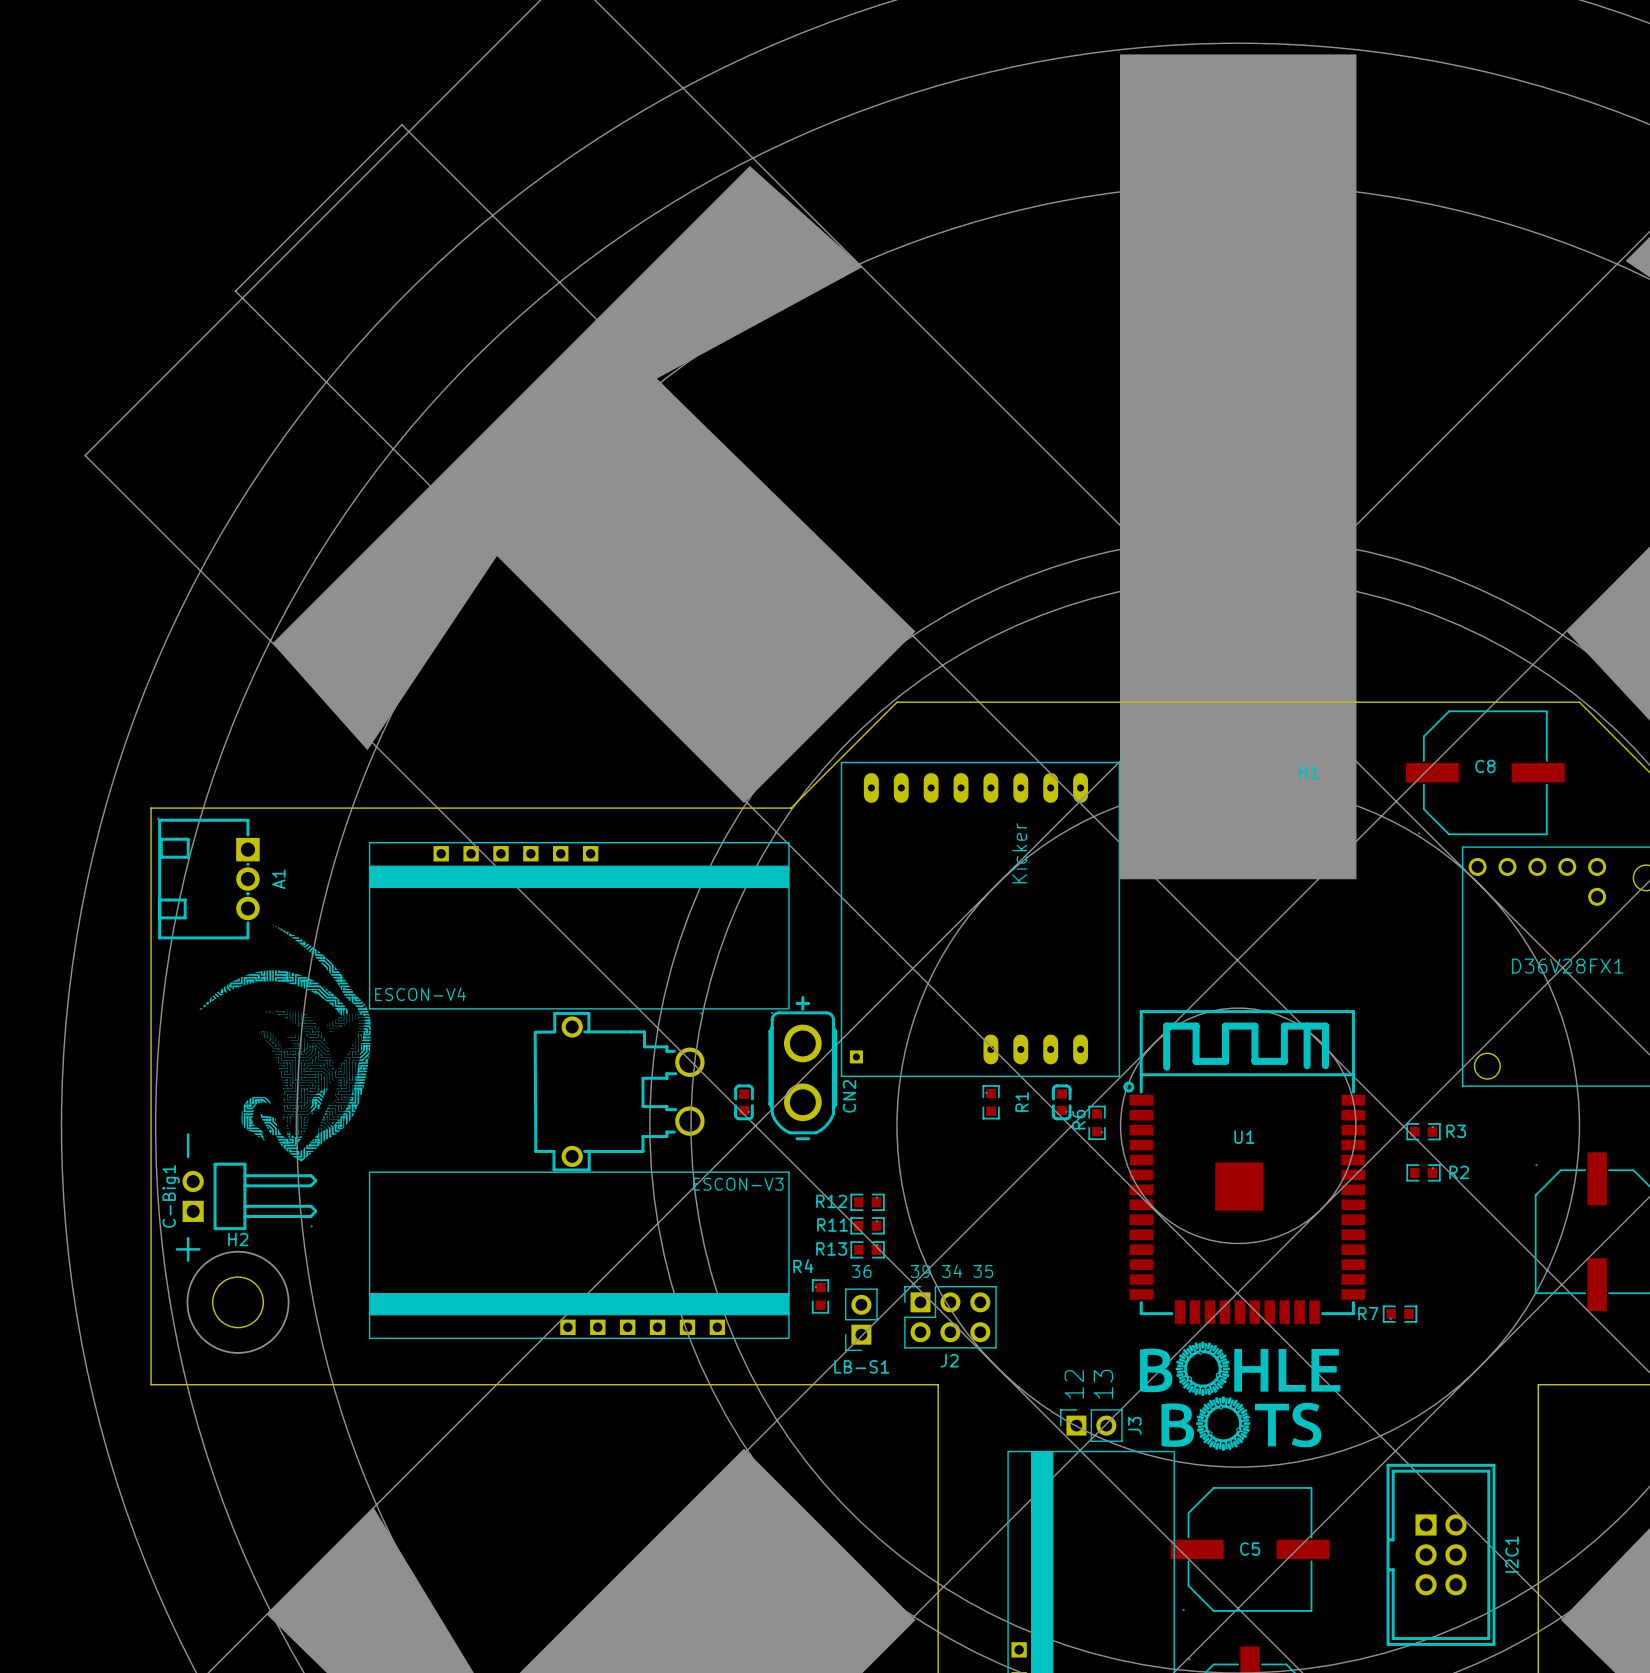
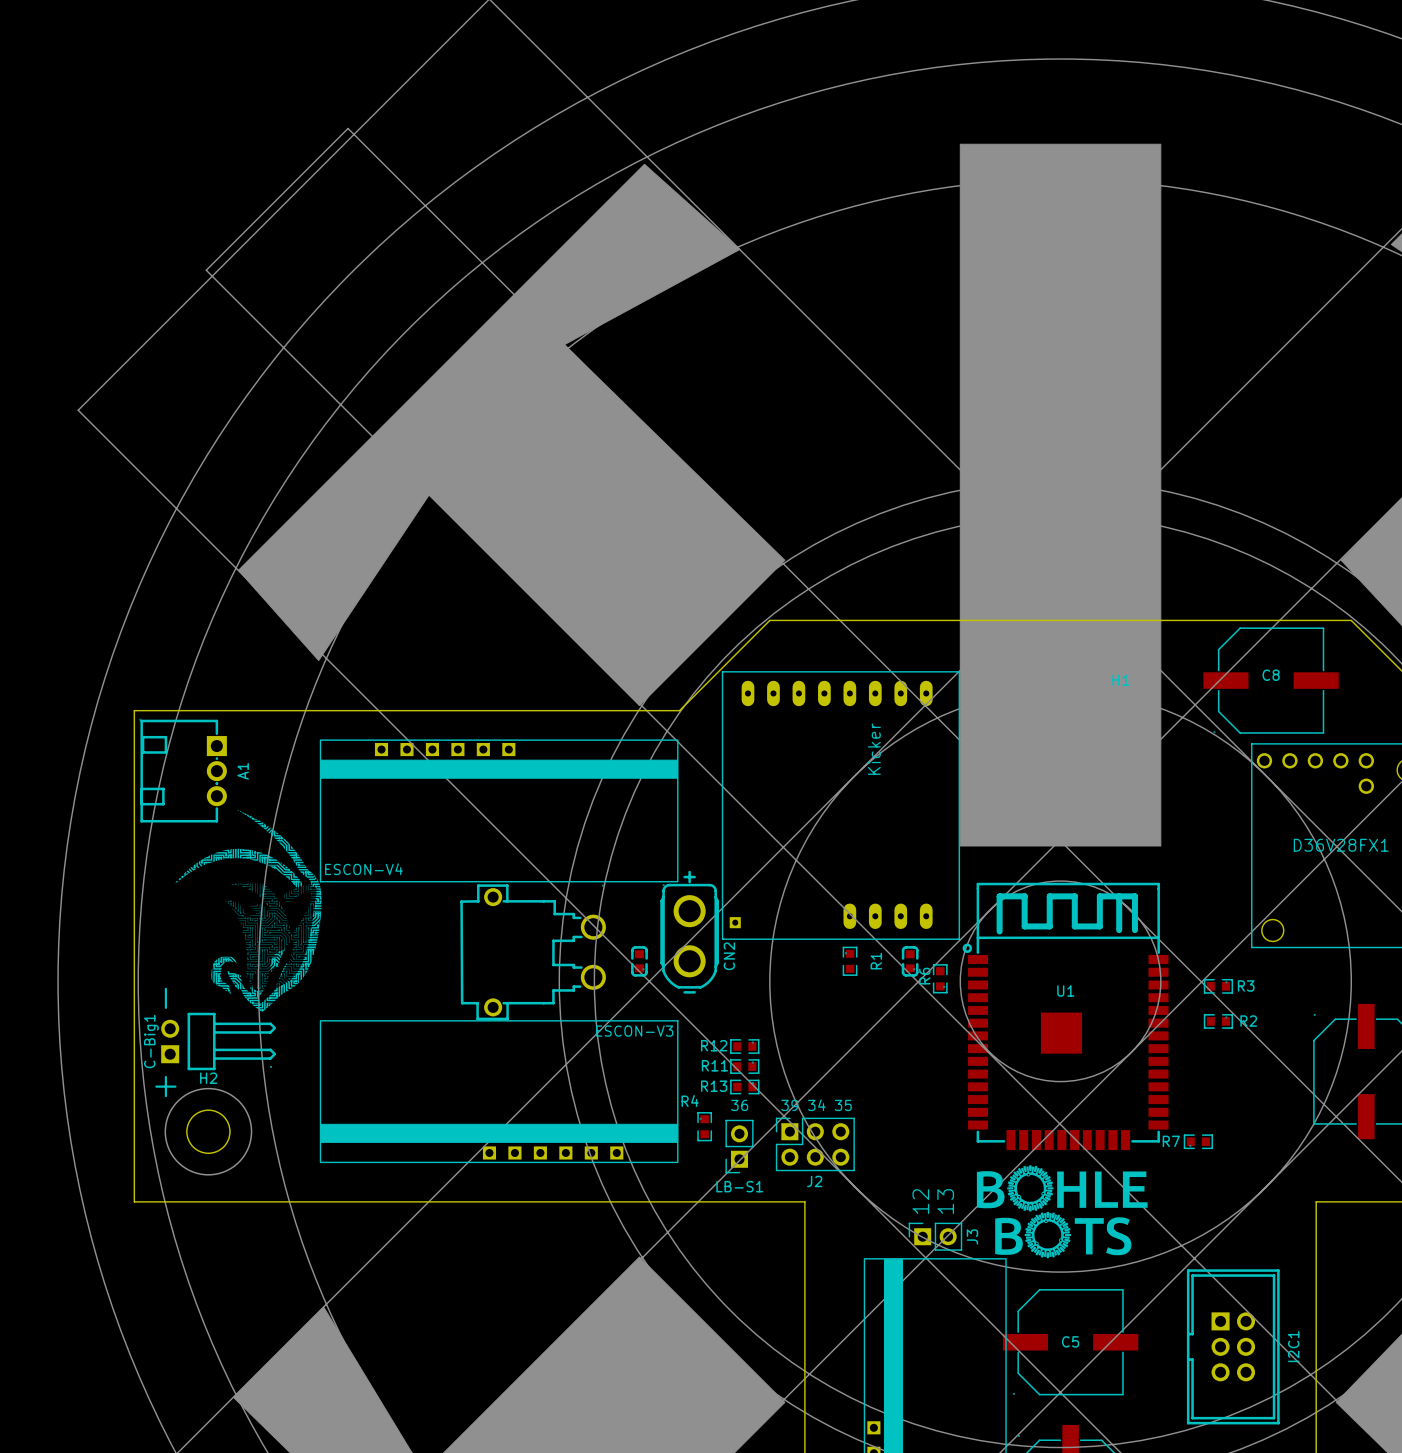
drawing position: (1238, 466) -> (1060, 495)

